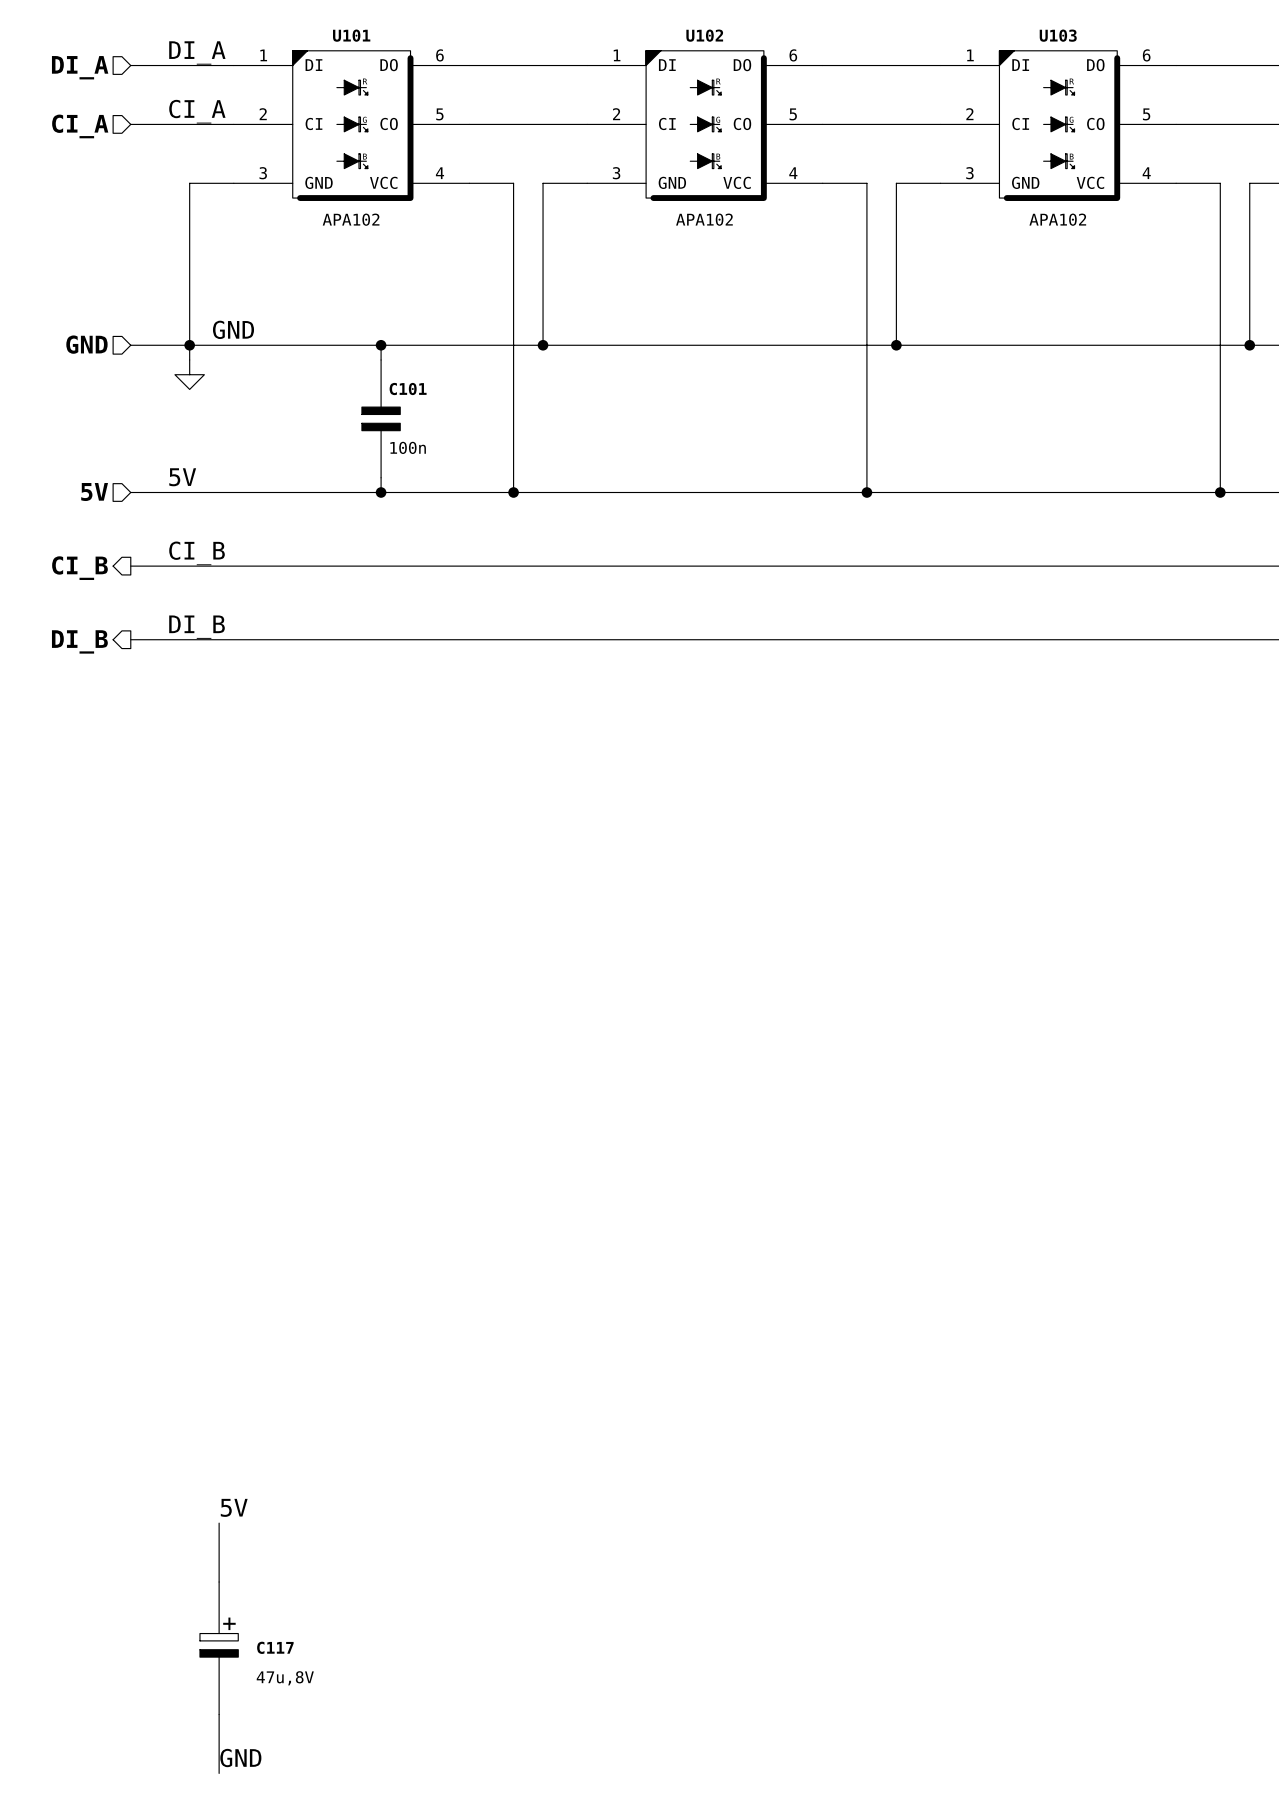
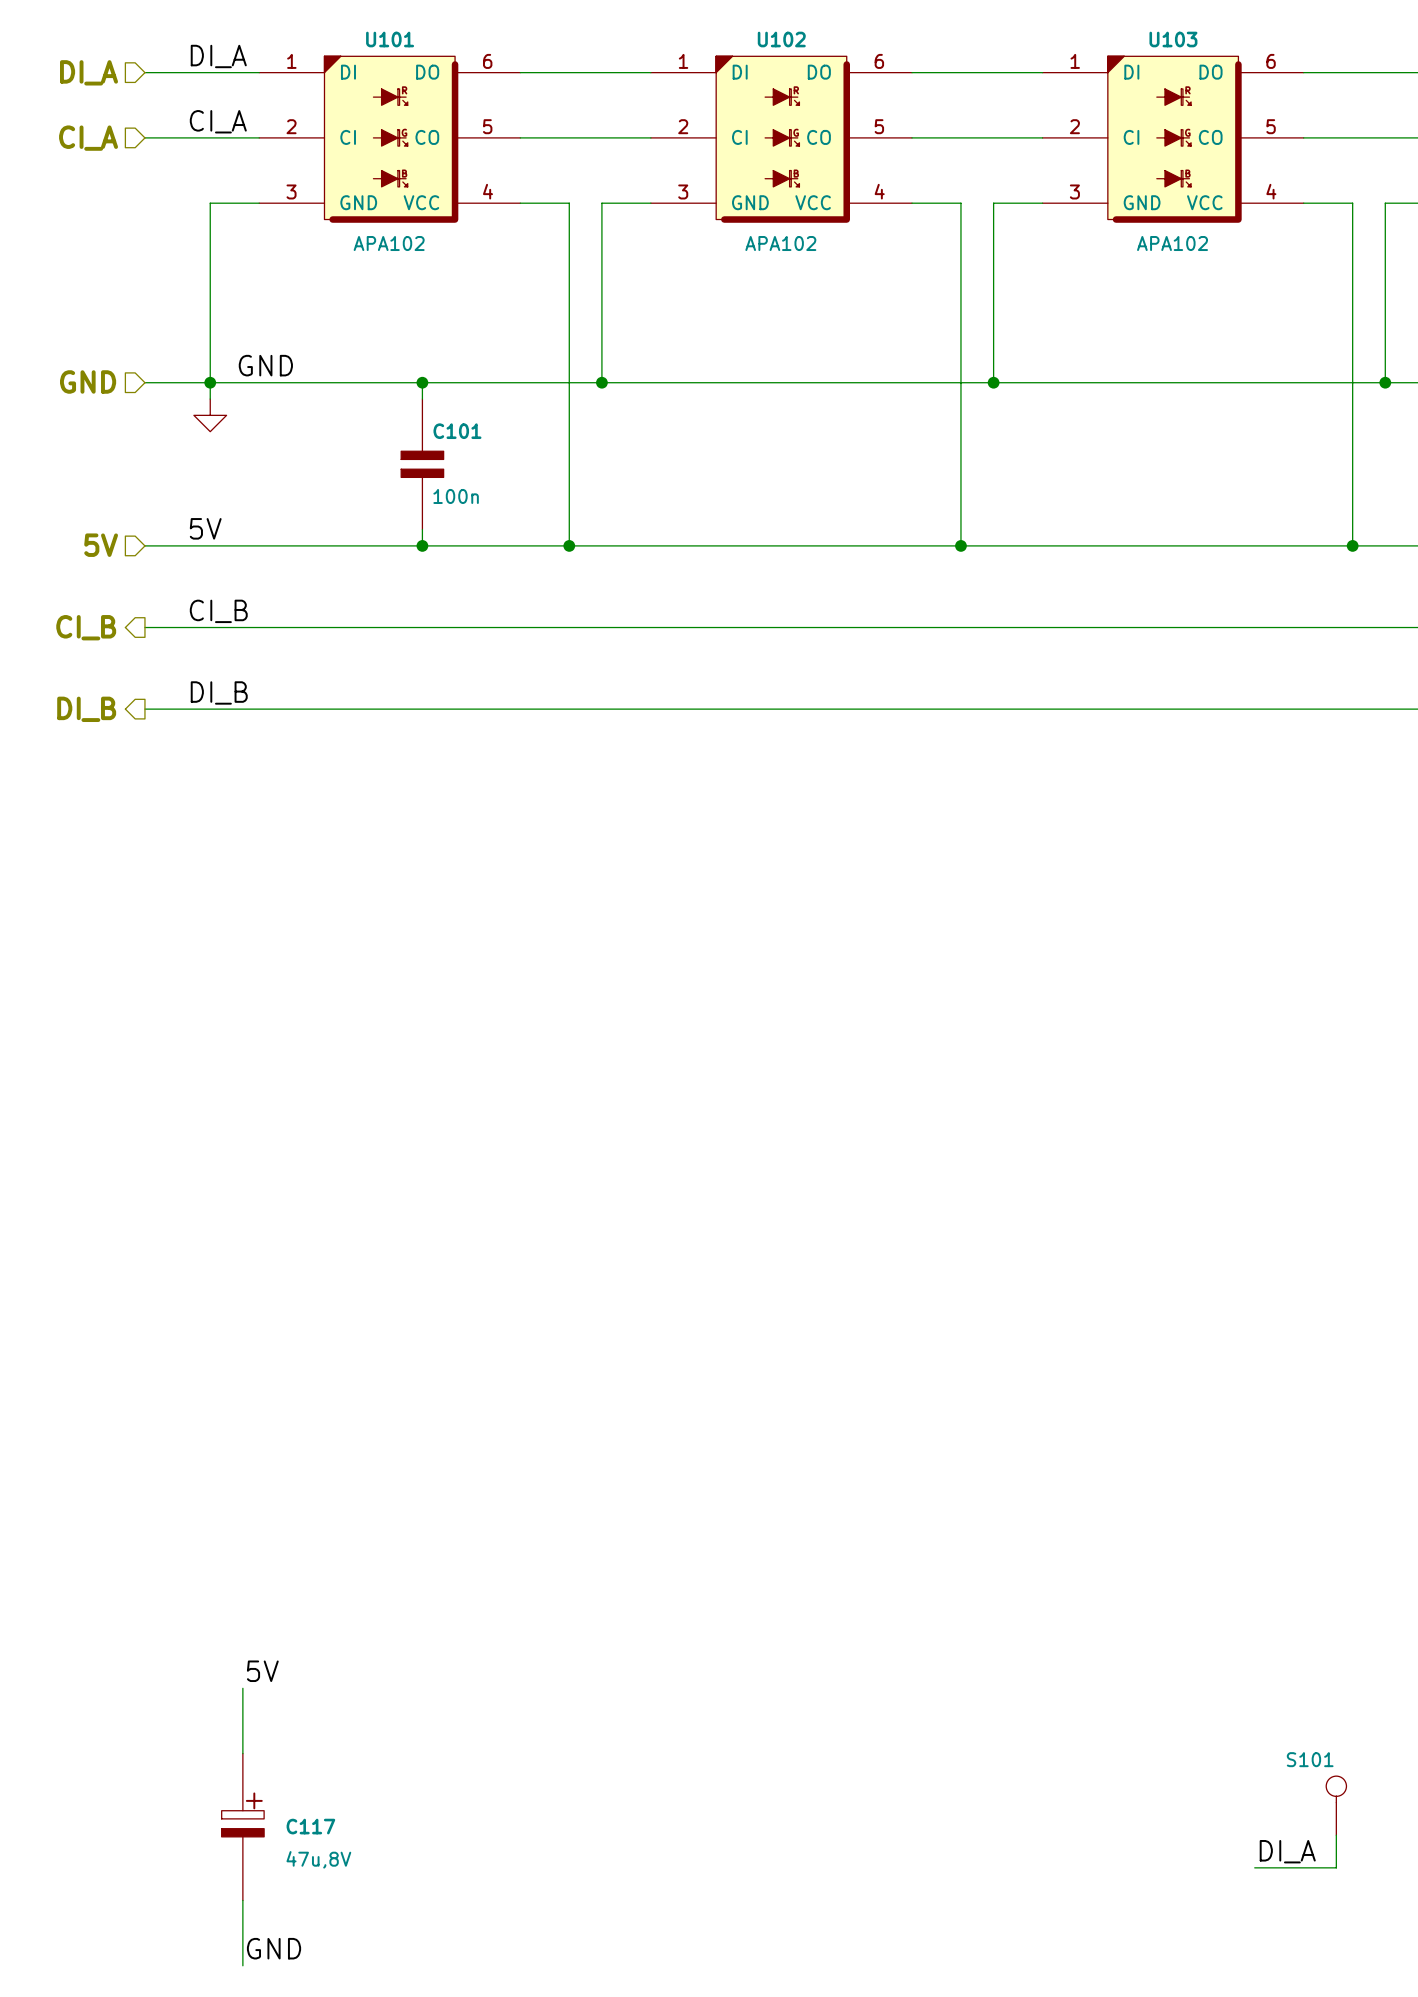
S101: none -> (1336, 1805)
wire: none -> (1336, 1835) (1336, 1867) (1254, 1867)
label: none -> DI_A (1287, 1851)

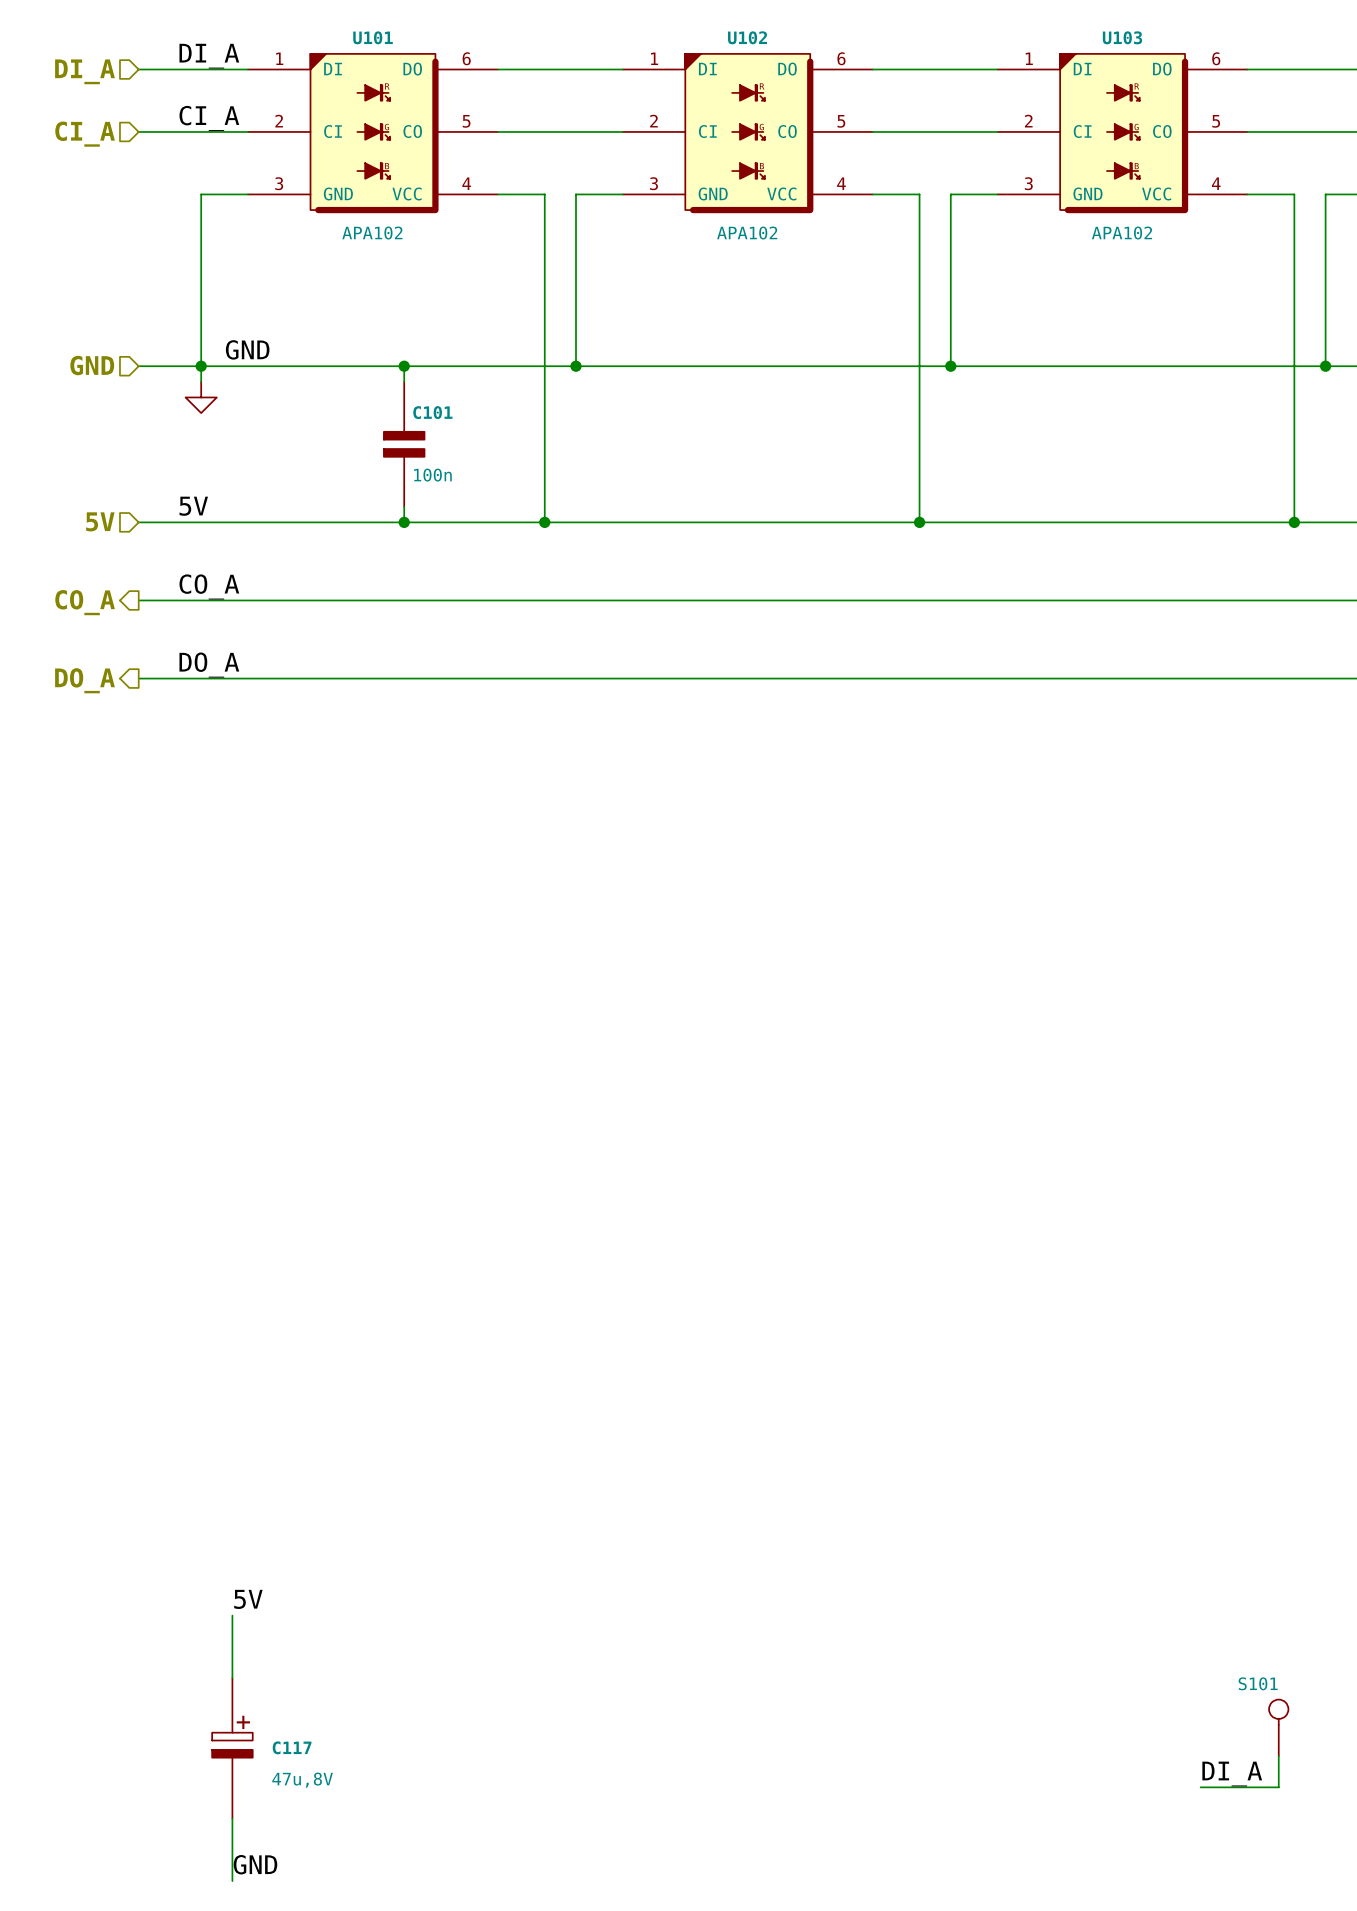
label: CI_B (218, 611) -> CO_A (209, 586)
hierarchical label: CI_B (86, 627) -> CO_A (85, 602)
label: DI_B (219, 692) -> DO_A (209, 665)
hierarchical label: DI_B (86, 709) -> DO_A (84, 680)

